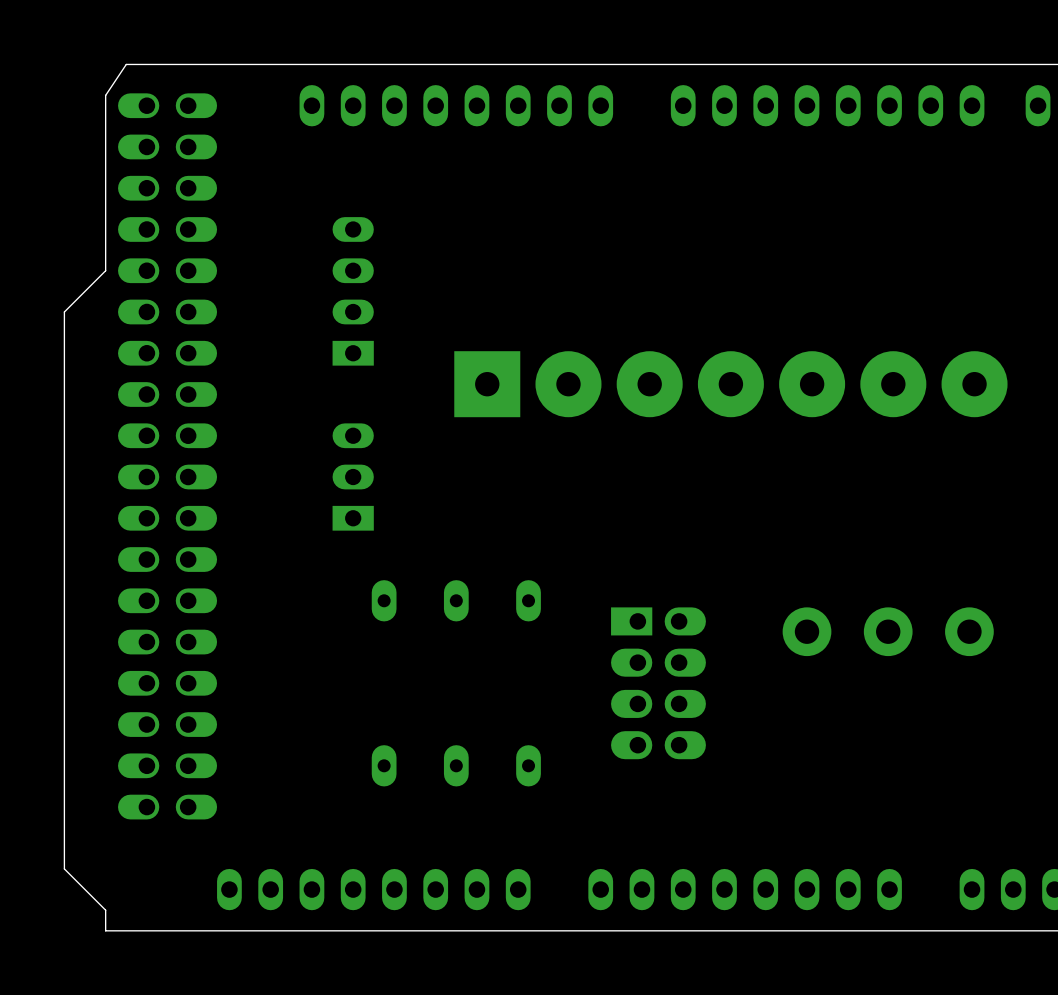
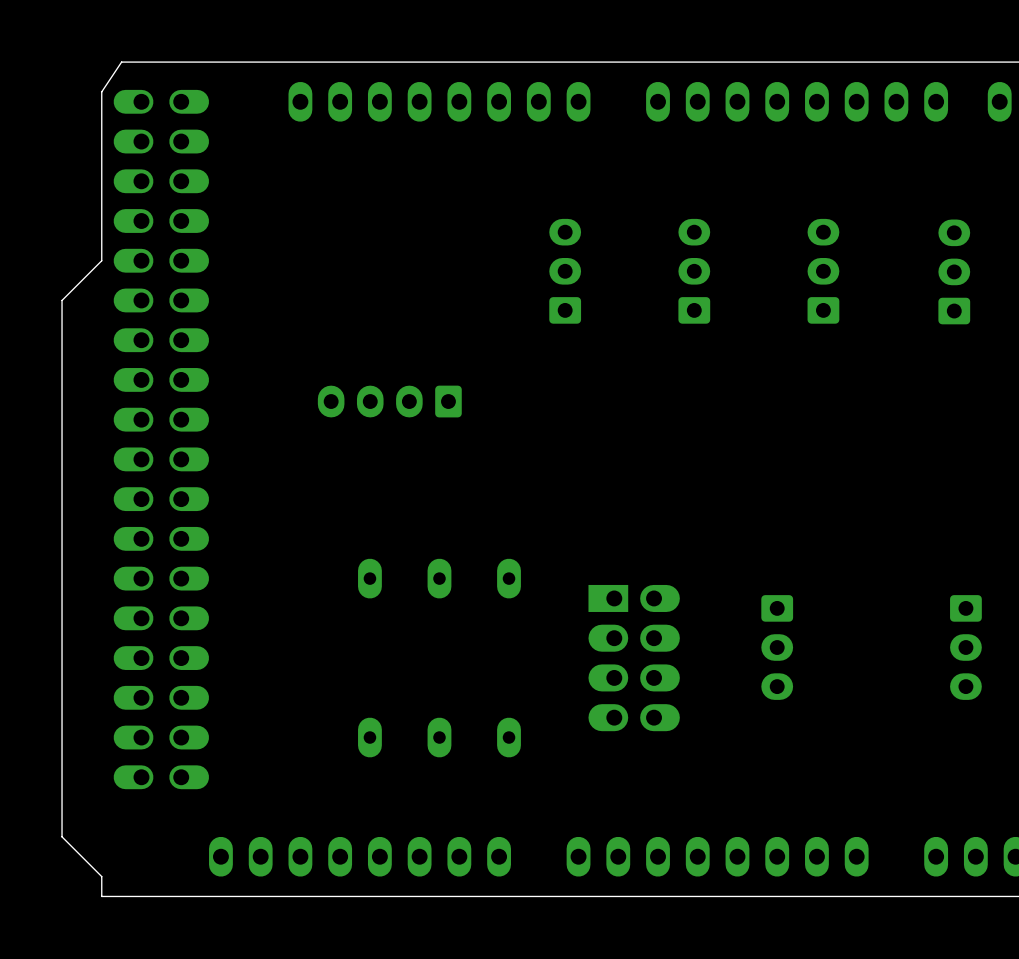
part: none -> (565, 271)
part: none -> (694, 271)
part: none -> (823, 271)
part: none -> (954, 271)
part: (353, 291) -> none
part: (730, 384) -> none
part: none -> (389, 401)
part: (353, 477) -> none
part: (888, 631) -> none
part: none -> (777, 647)
part: none -> (965, 647)

